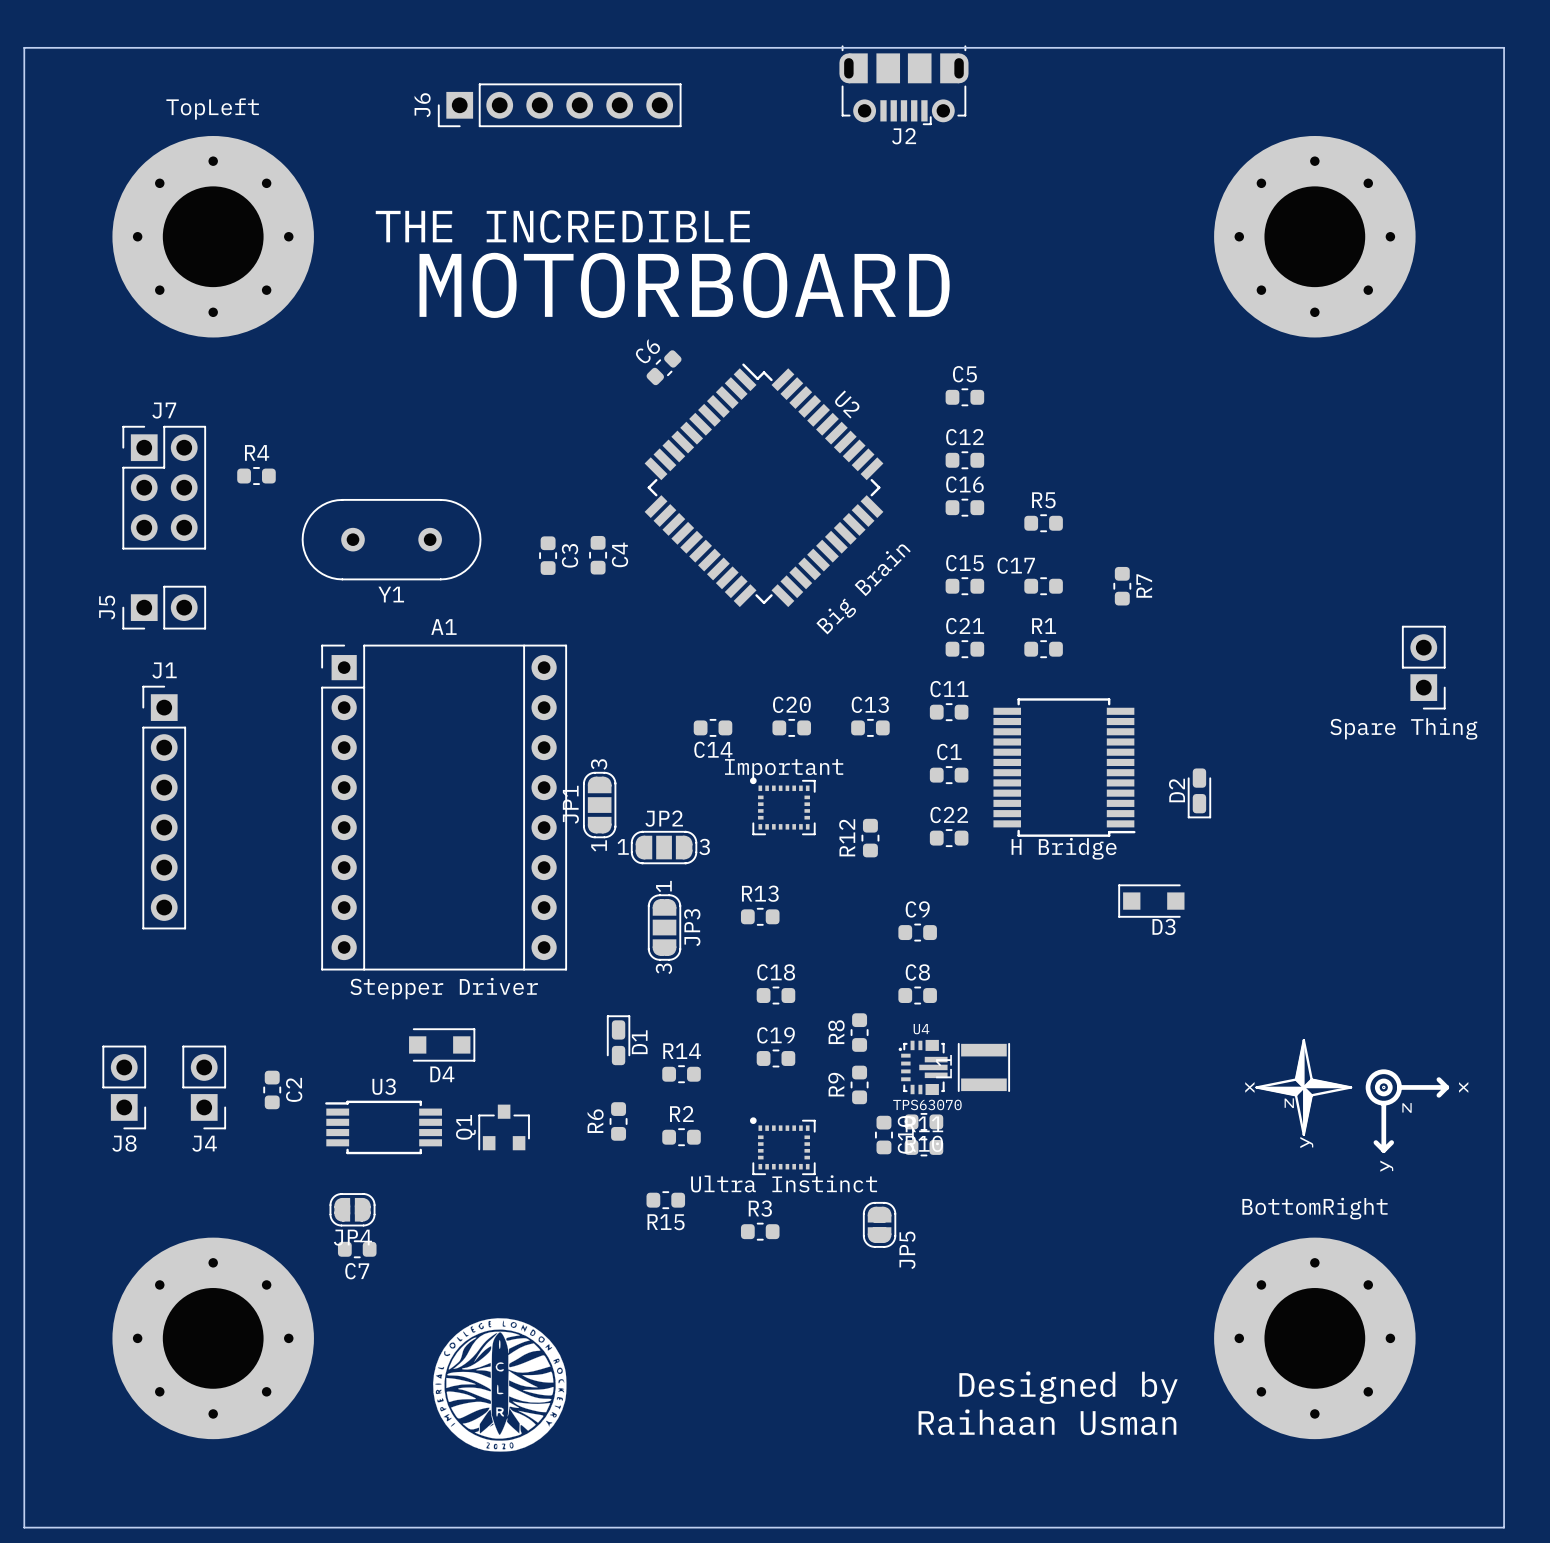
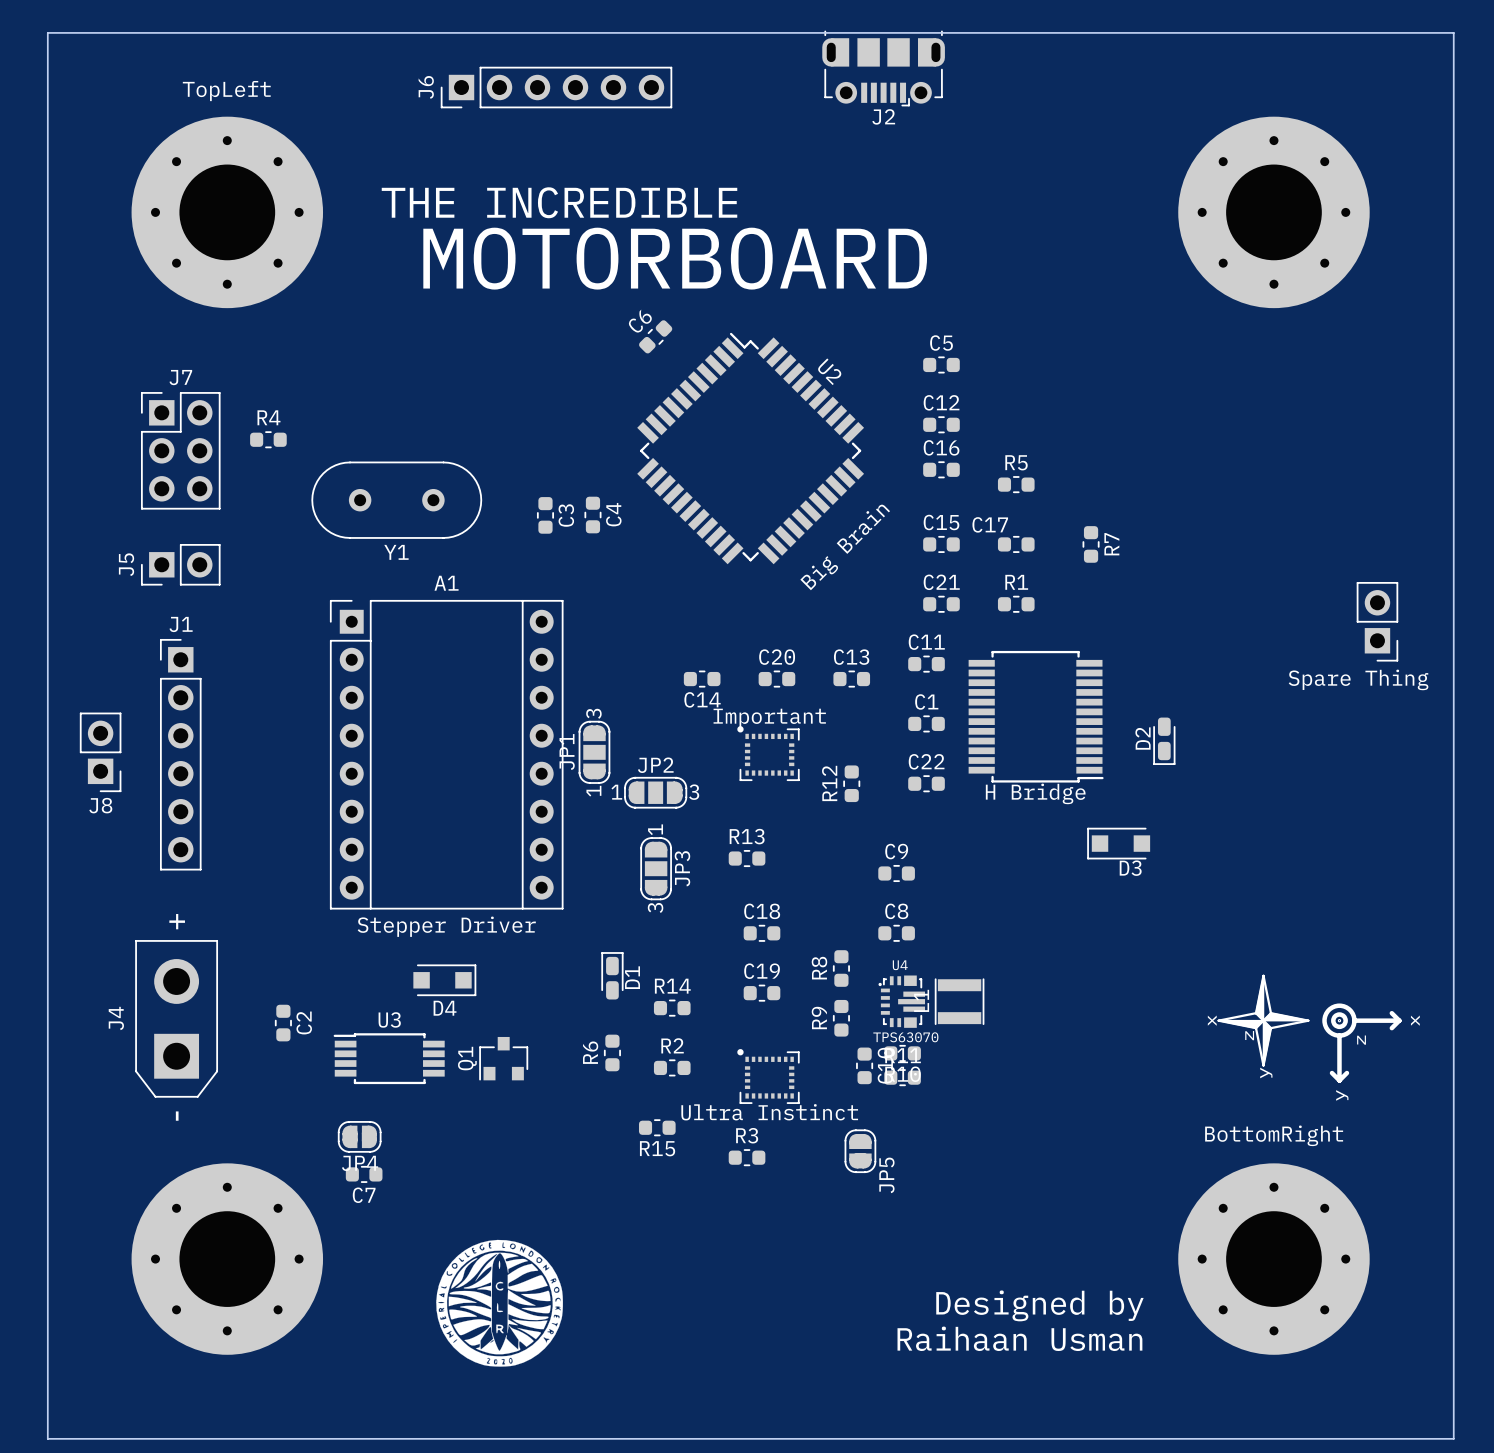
J4 footprint: [182, 1045, 227, 1130] -> [135, 940, 219, 1098]
J8 position: (124, 1087) -> (100, 752)
J4 name position: J4 (204, 1143) -> J4 (116, 1018)

